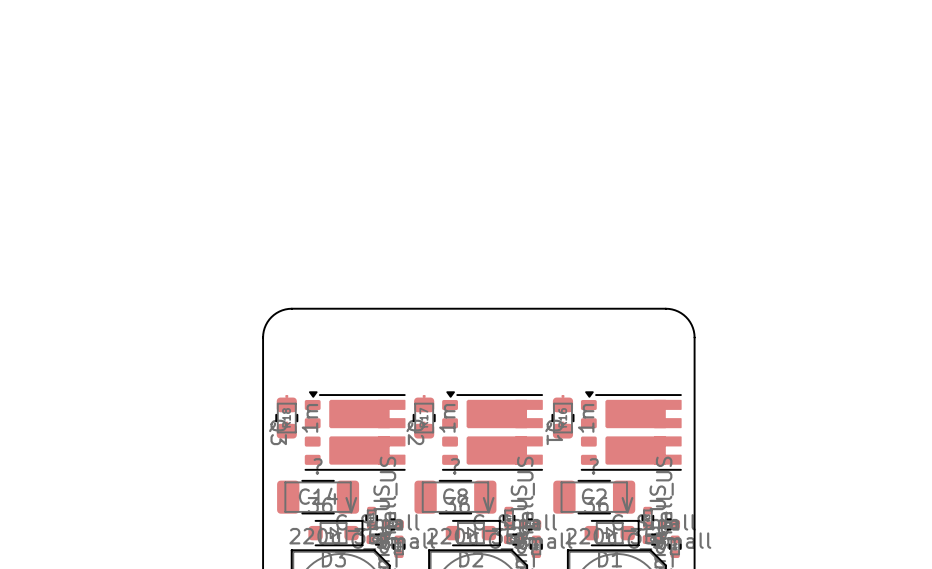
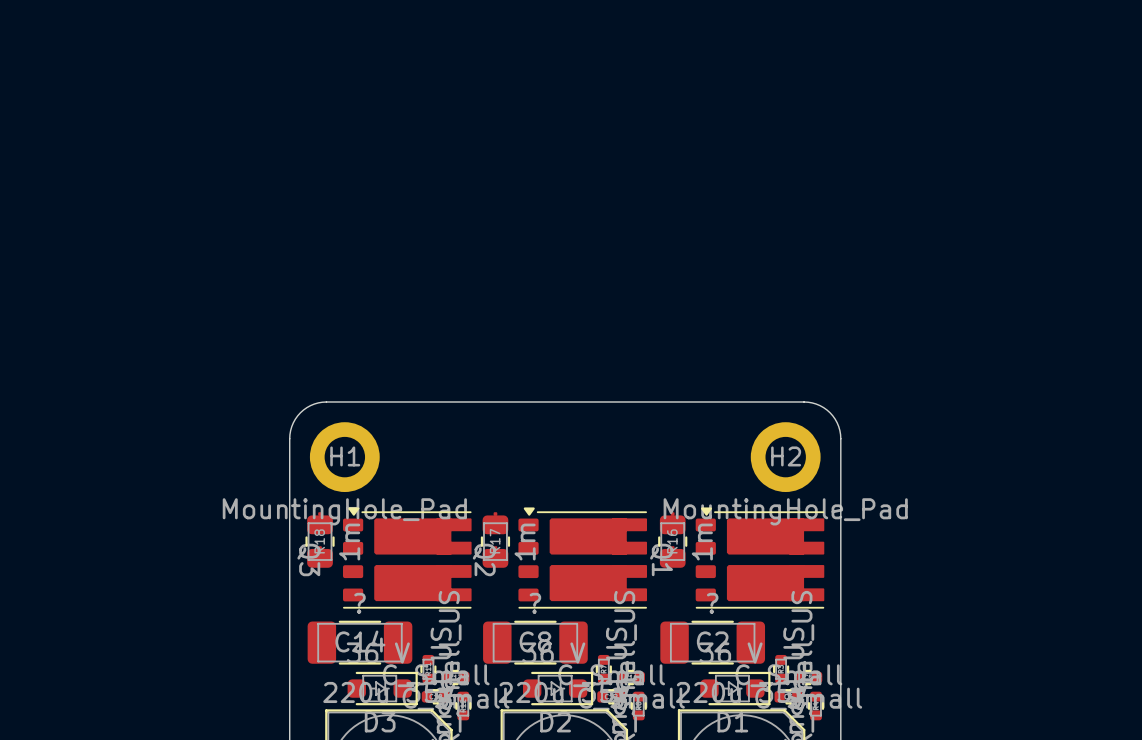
H1: none -> MountingHole_Pad (344, 457)
H2: none -> MountingHole_Pad (785, 457)

